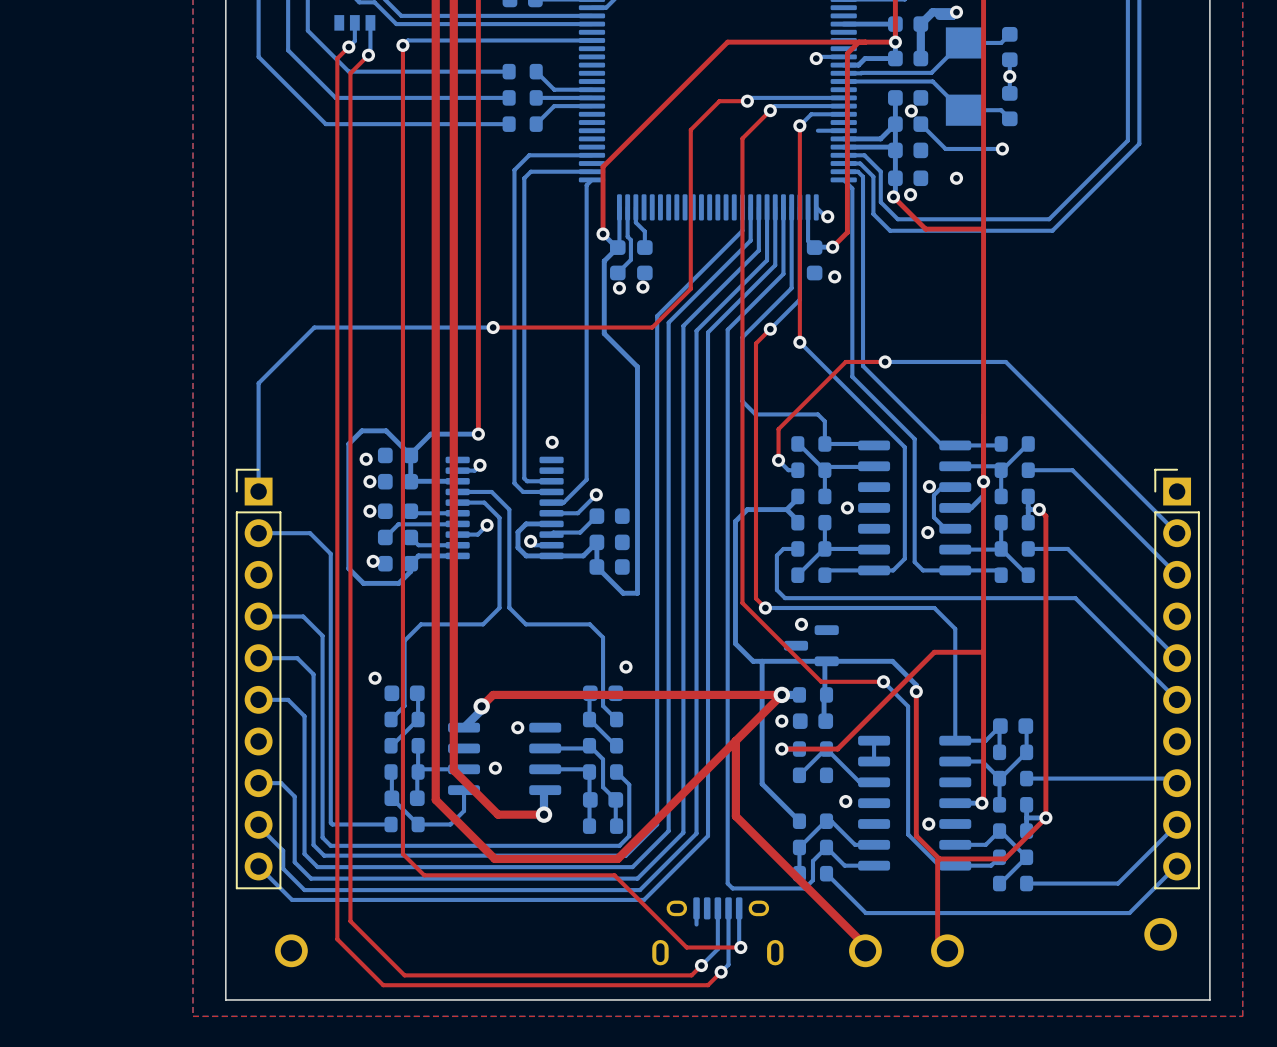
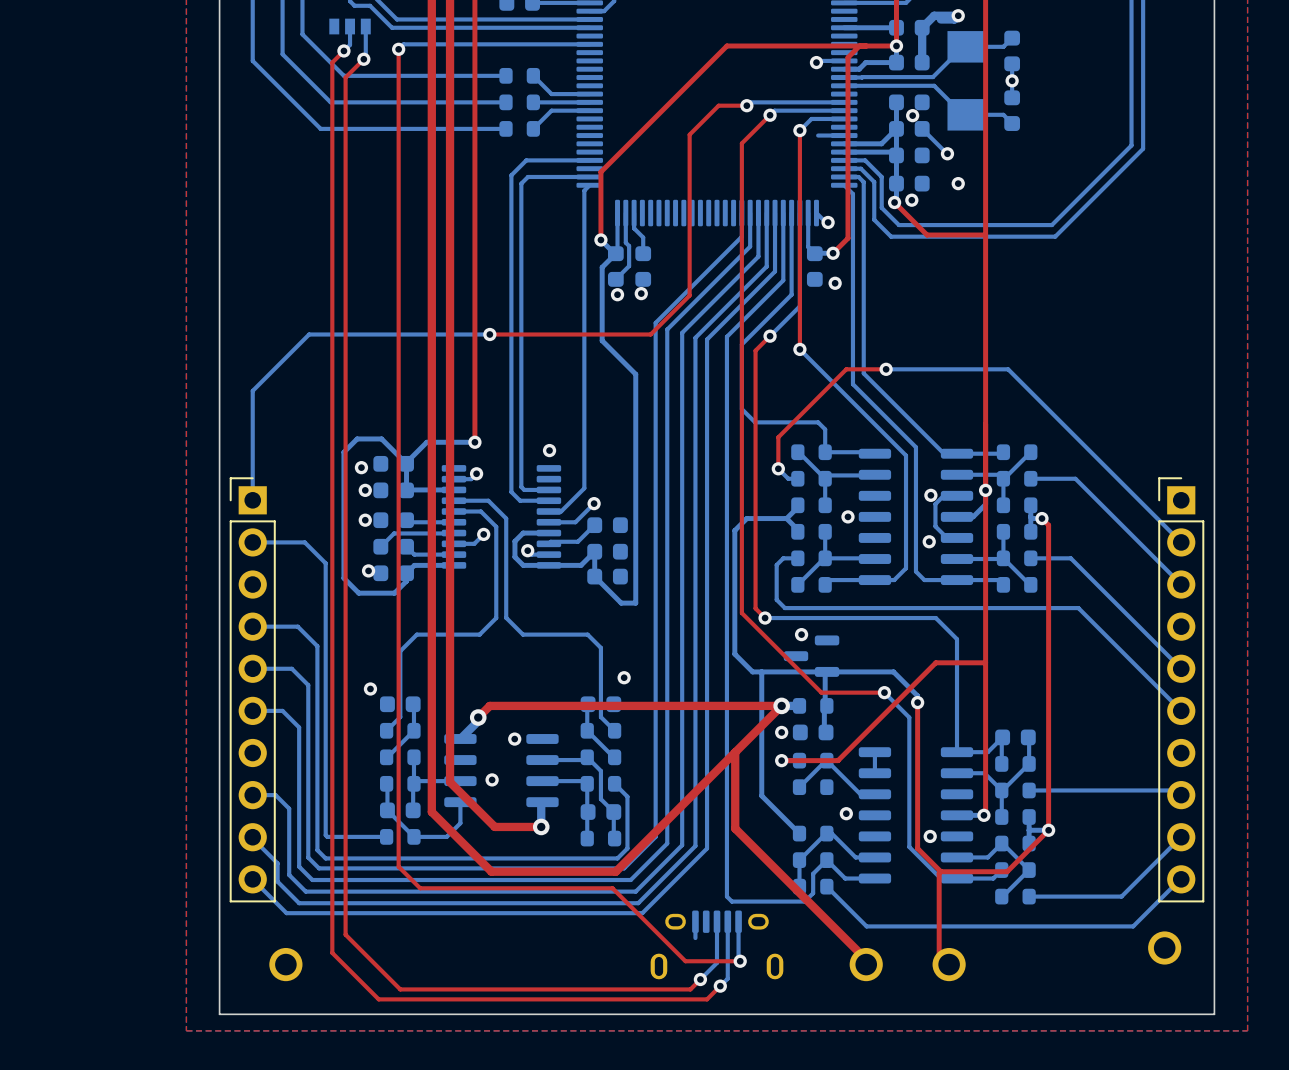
bottom track: (945, 148) (1002, 148) -> none
via position: (1002, 148) -> (947, 153)

